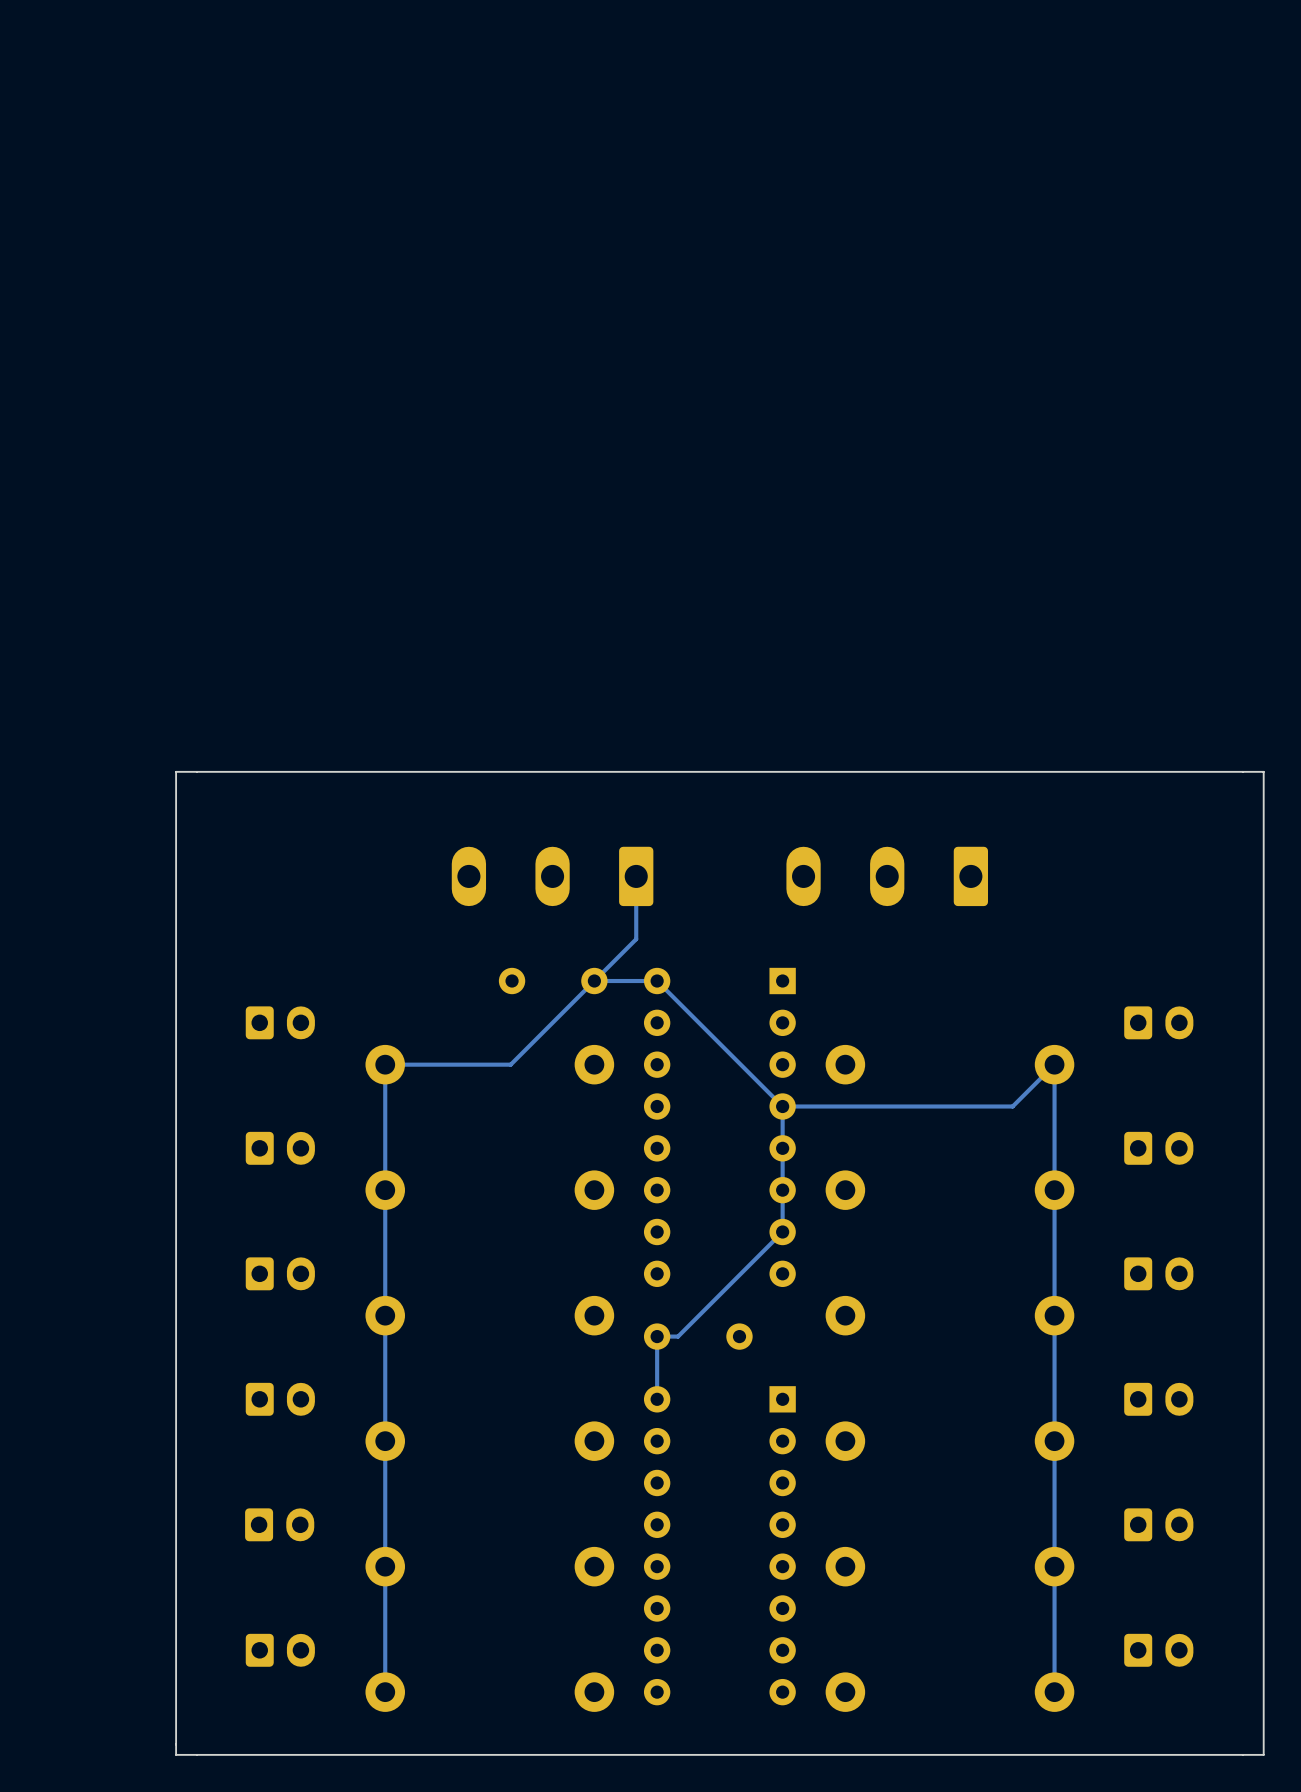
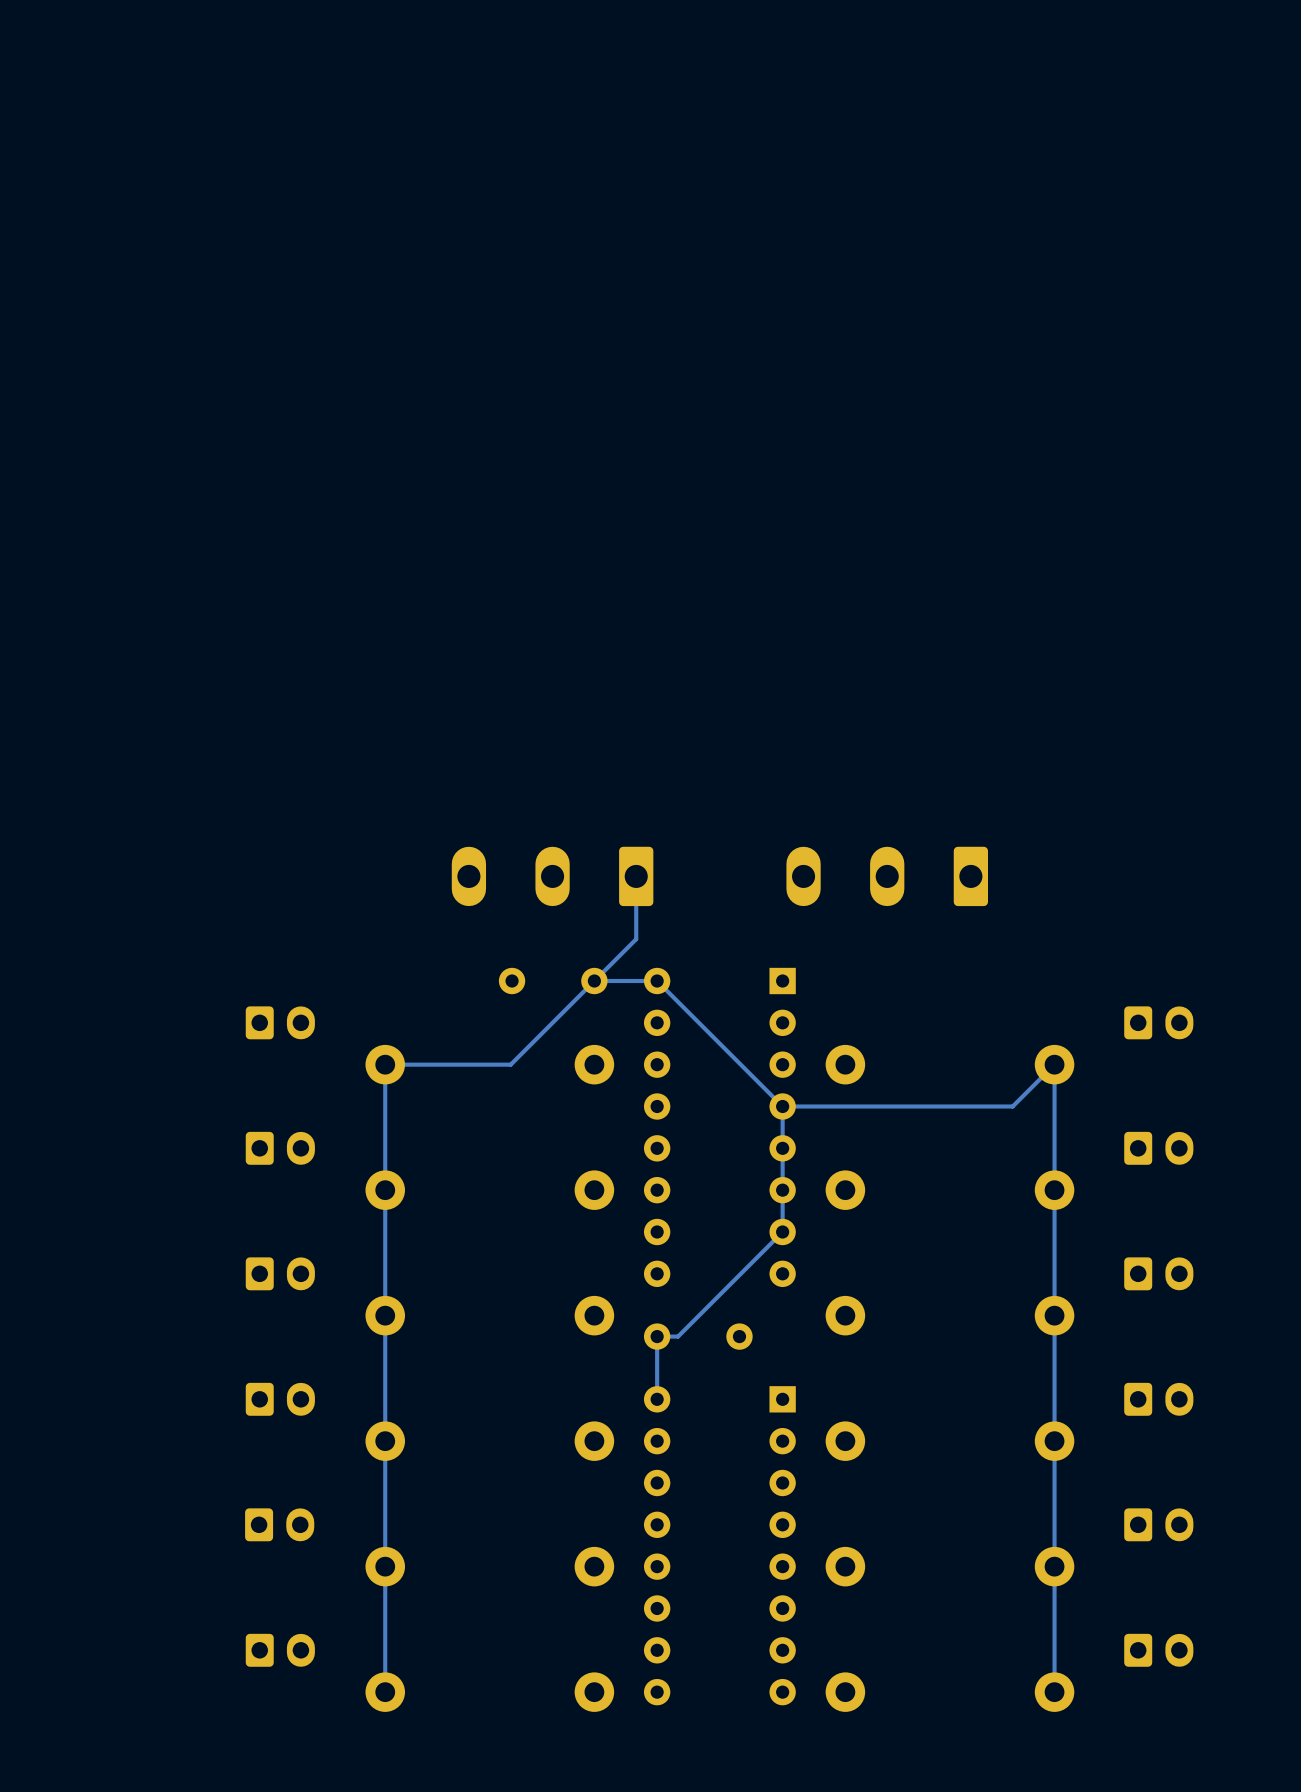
board edge: (1263, 771) (176, 771) (176, 1754) (1263, 1754) (1263, 771) -> none

